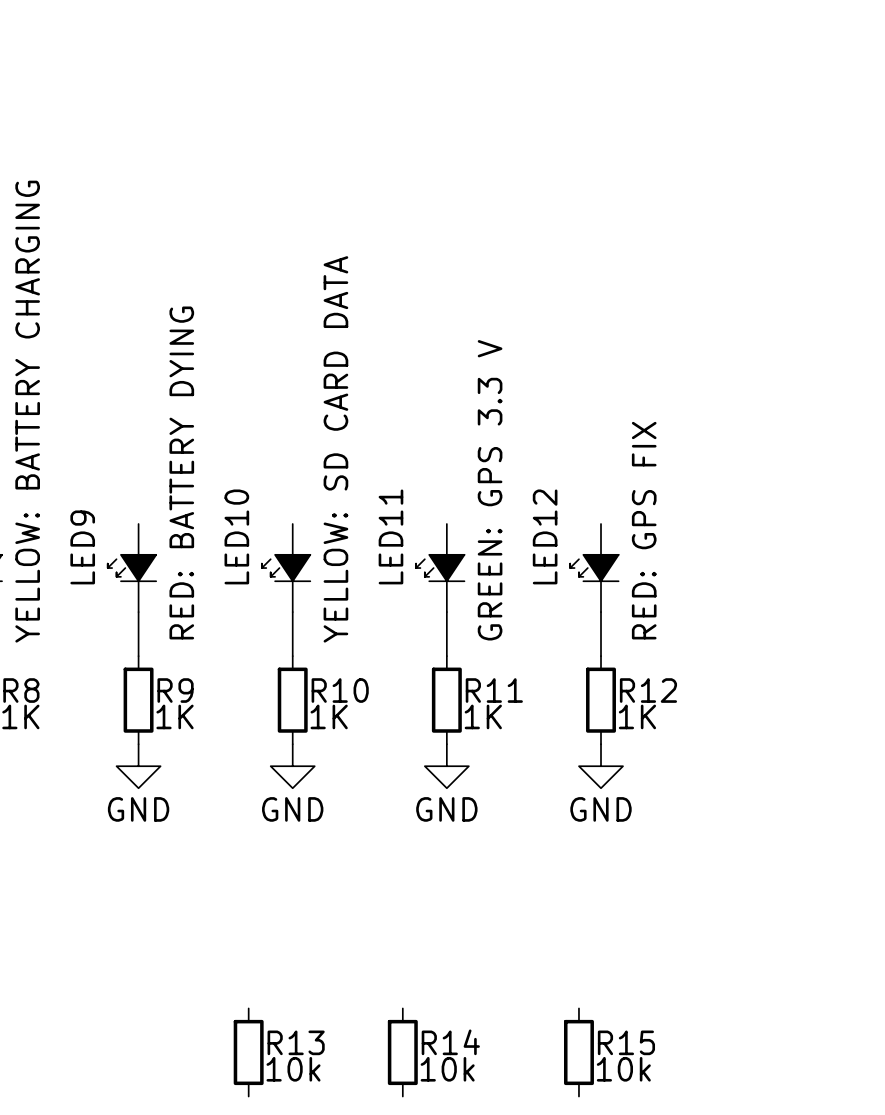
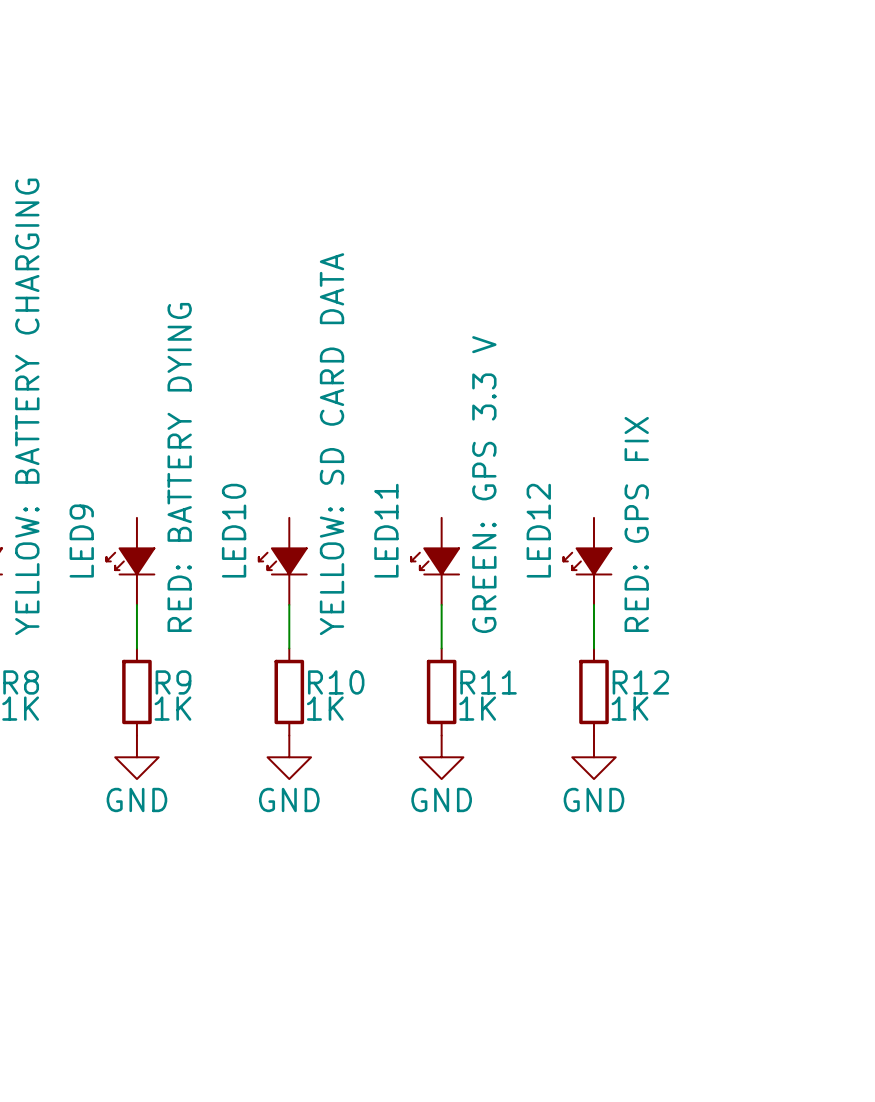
R13: 10k (248, 1052) -> none
R14: 10k (402, 1052) -> none
R15: 10k (578, 1052) -> none

